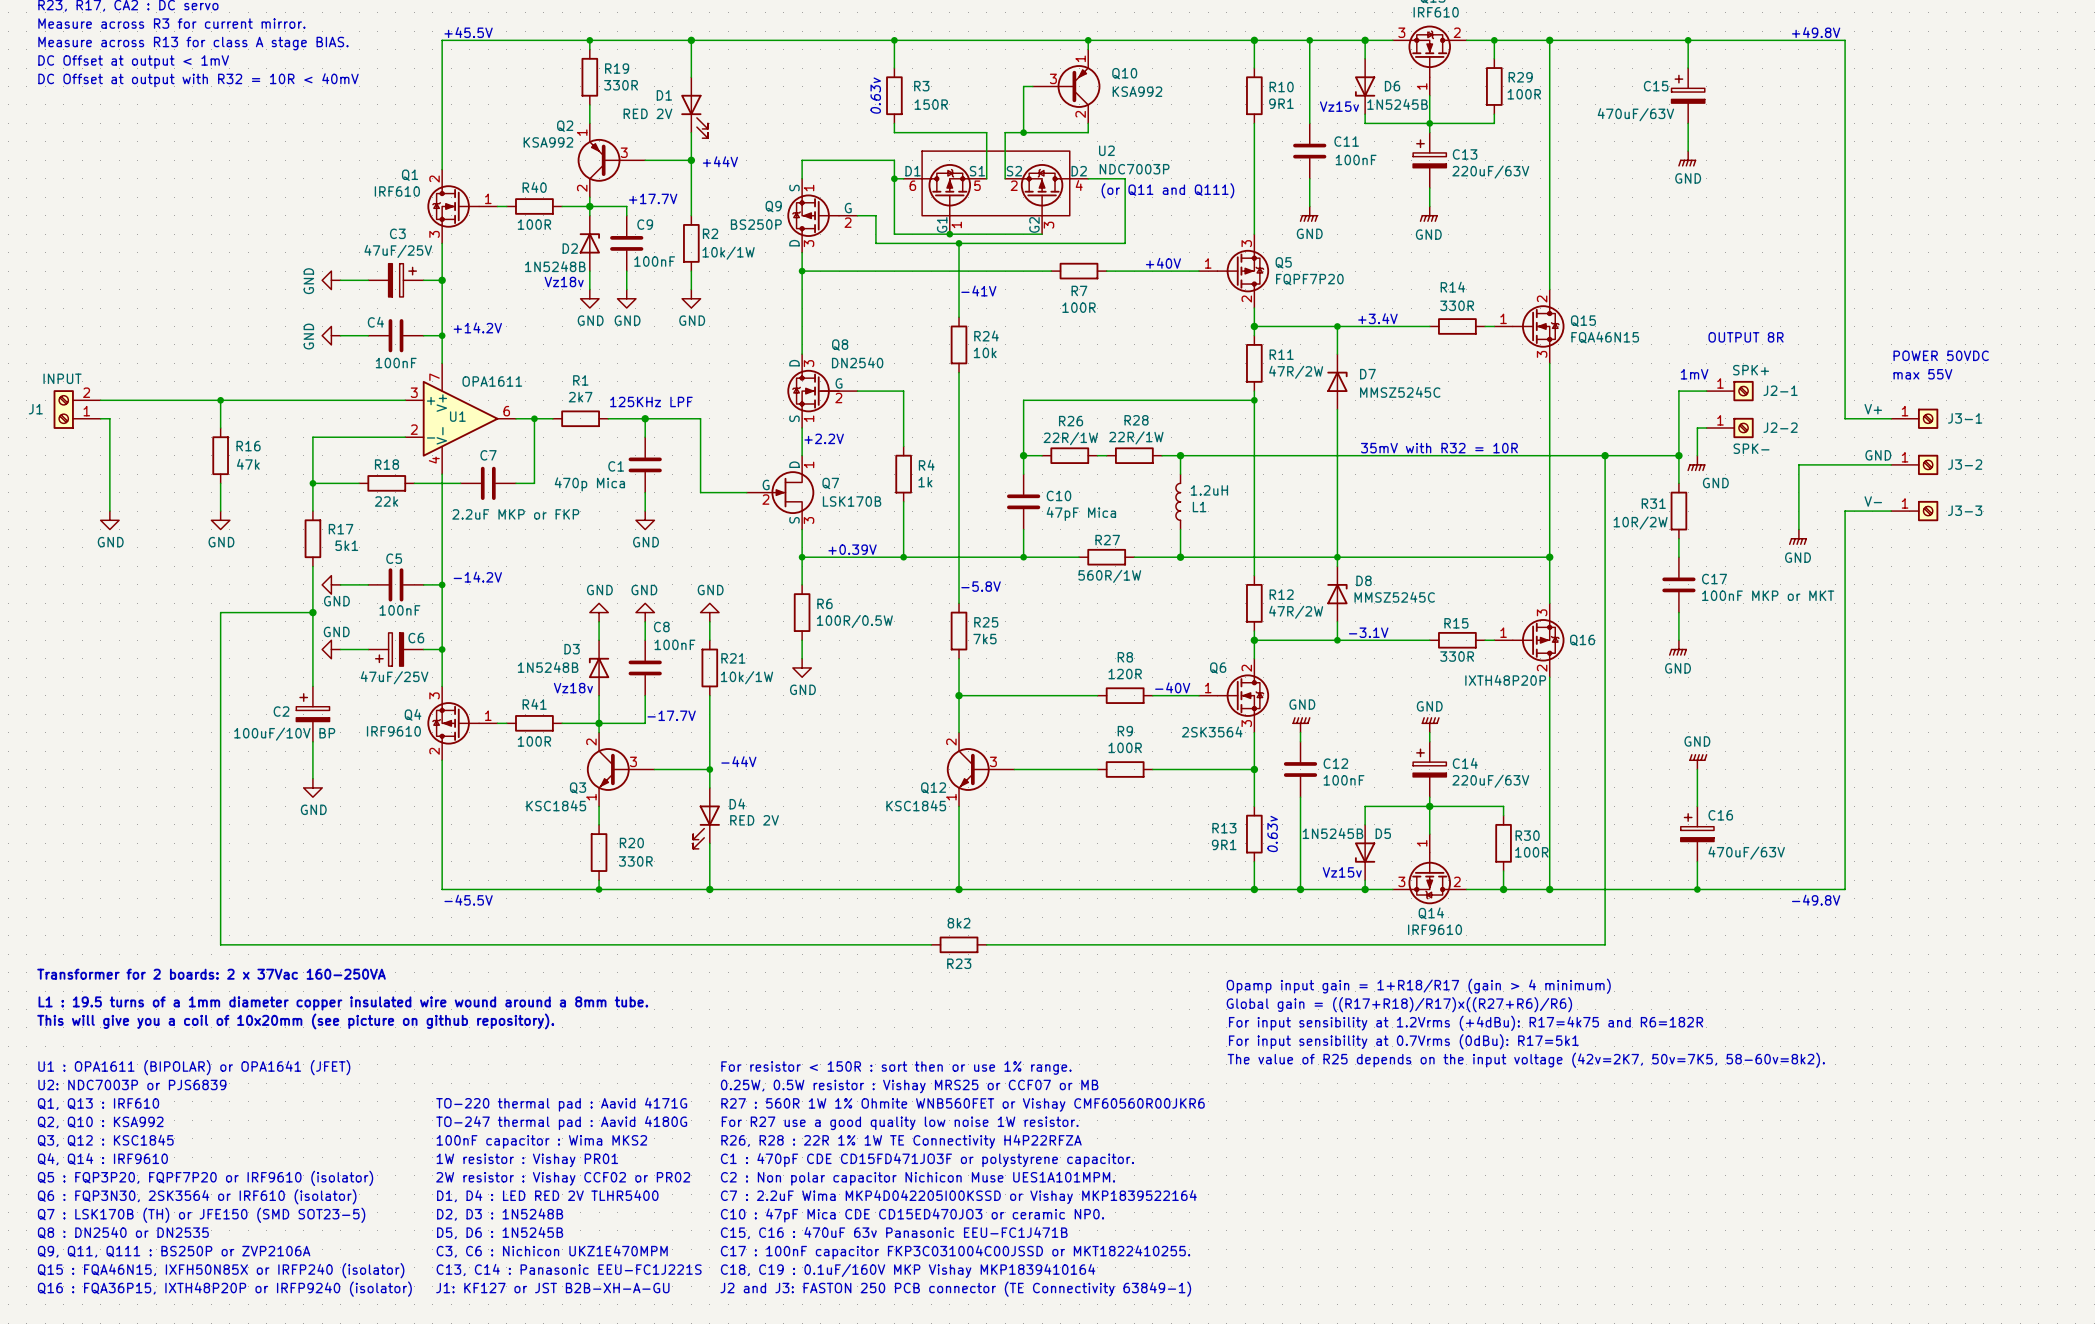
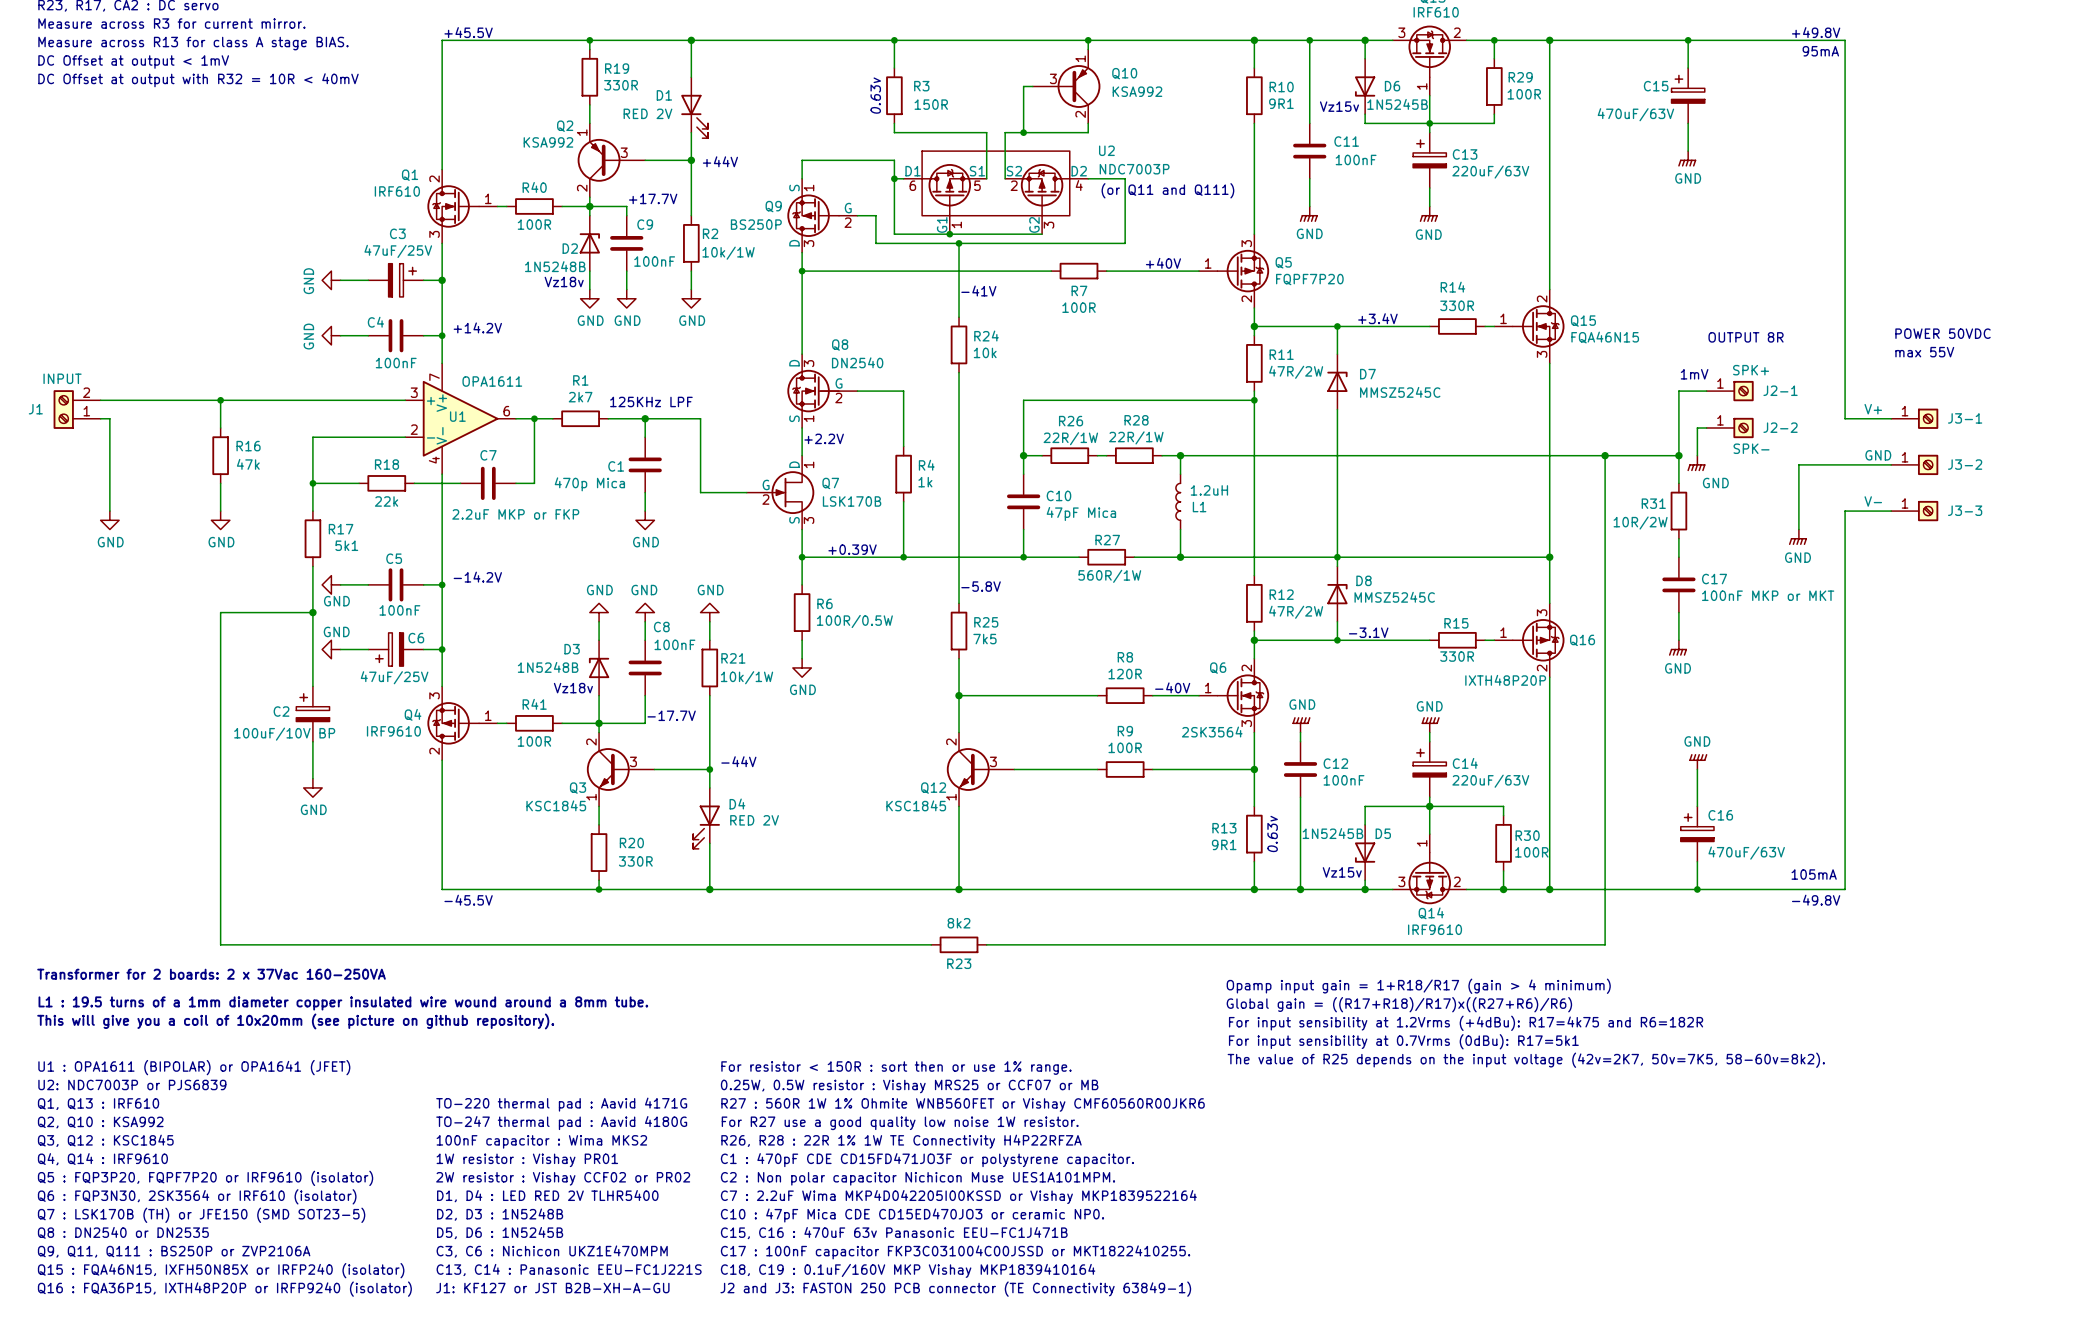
text: none -> 95mA (1820, 51)
text: none -> POWER 50VDC (1943, 333)
text: POWER 50VDC (1941, 355) -> max 55V (1924, 352)
text: max 55V (1922, 374) -> none
text: 35mV with R32 = 10R (1439, 448) -> none
text: none -> 105mA (1814, 874)

